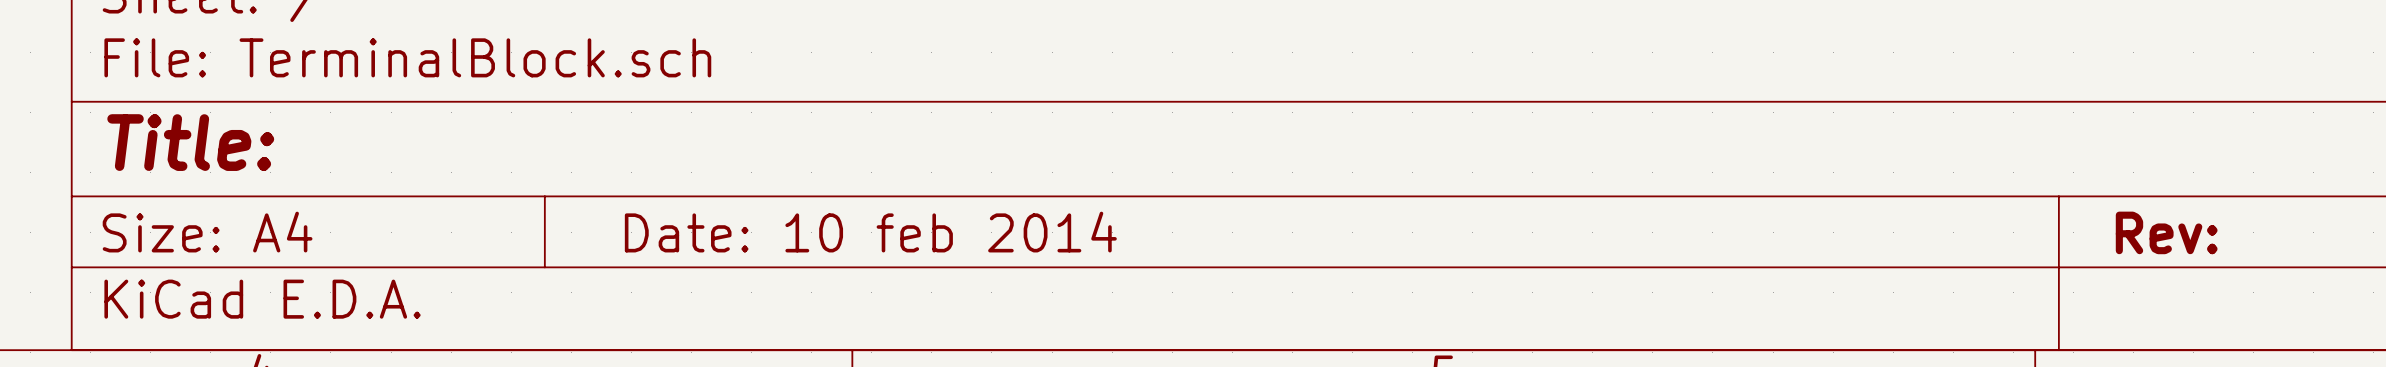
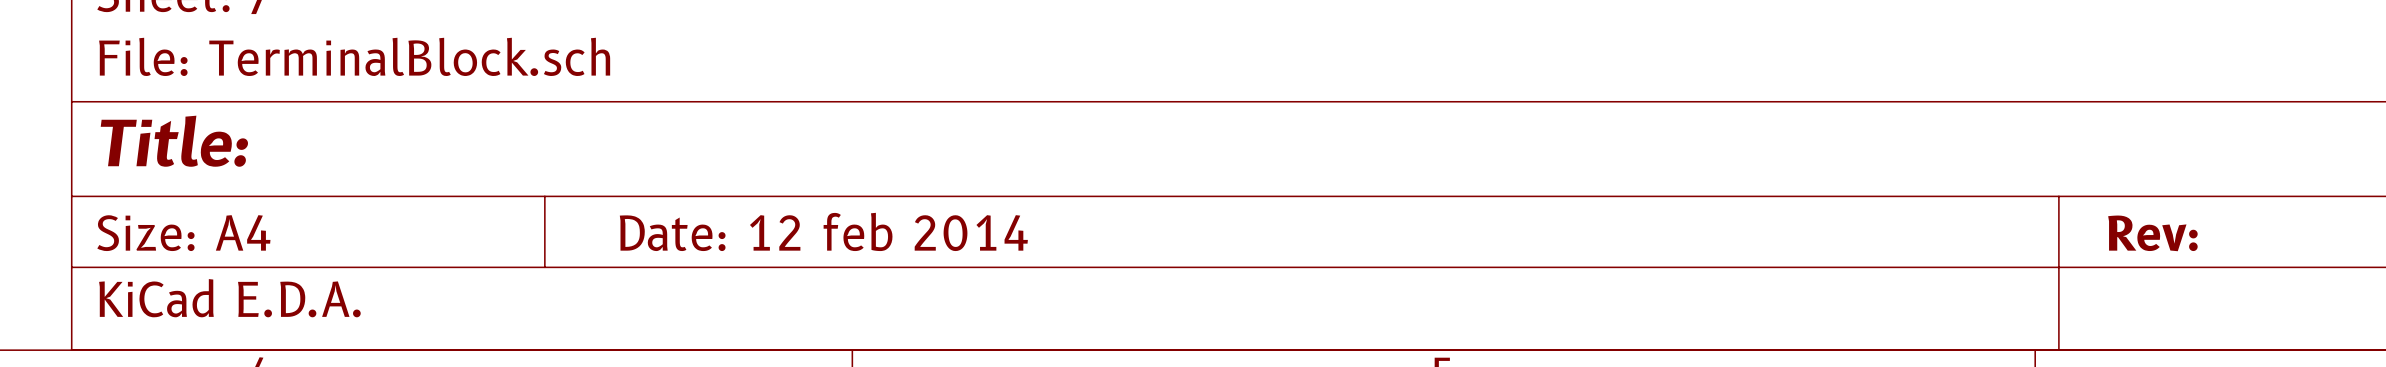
title block: Date: 10 feb 2014 (870, 232) -> Date: 12 feb 2014 (823, 231)

